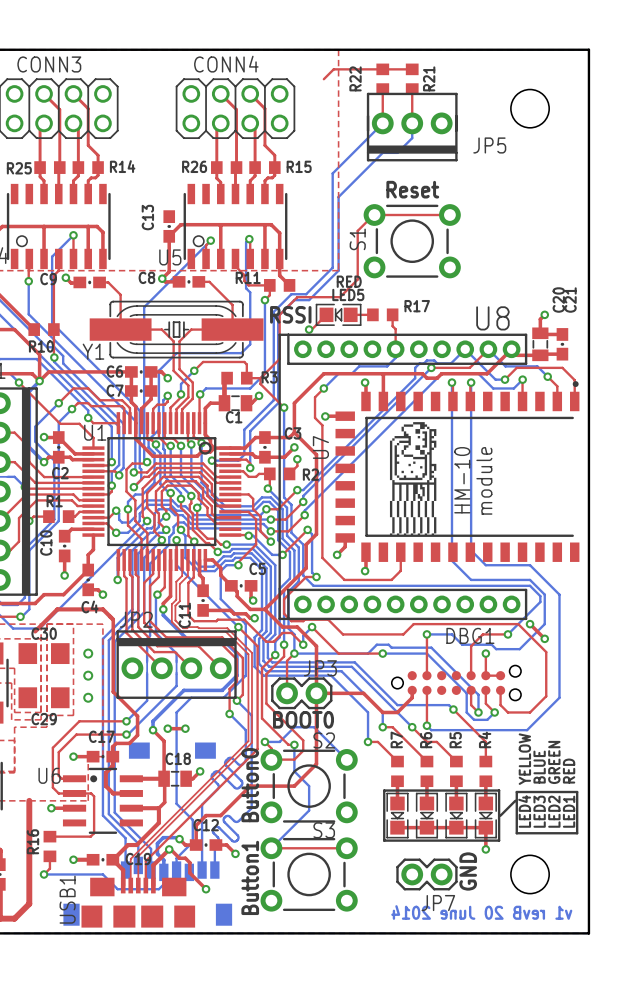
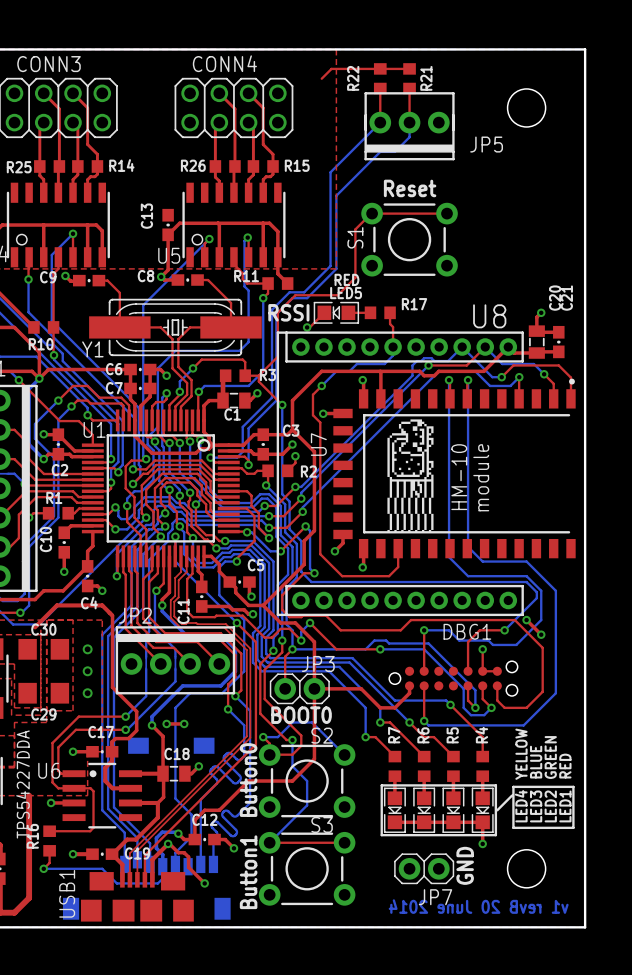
JP3 footprint: [271, 677, 333, 710] -> [269, 673, 330, 705]
part value: none -> TPS54227DDA (22, 784)
JP7 footprint: [396, 858, 458, 891] -> [394, 853, 455, 885]

